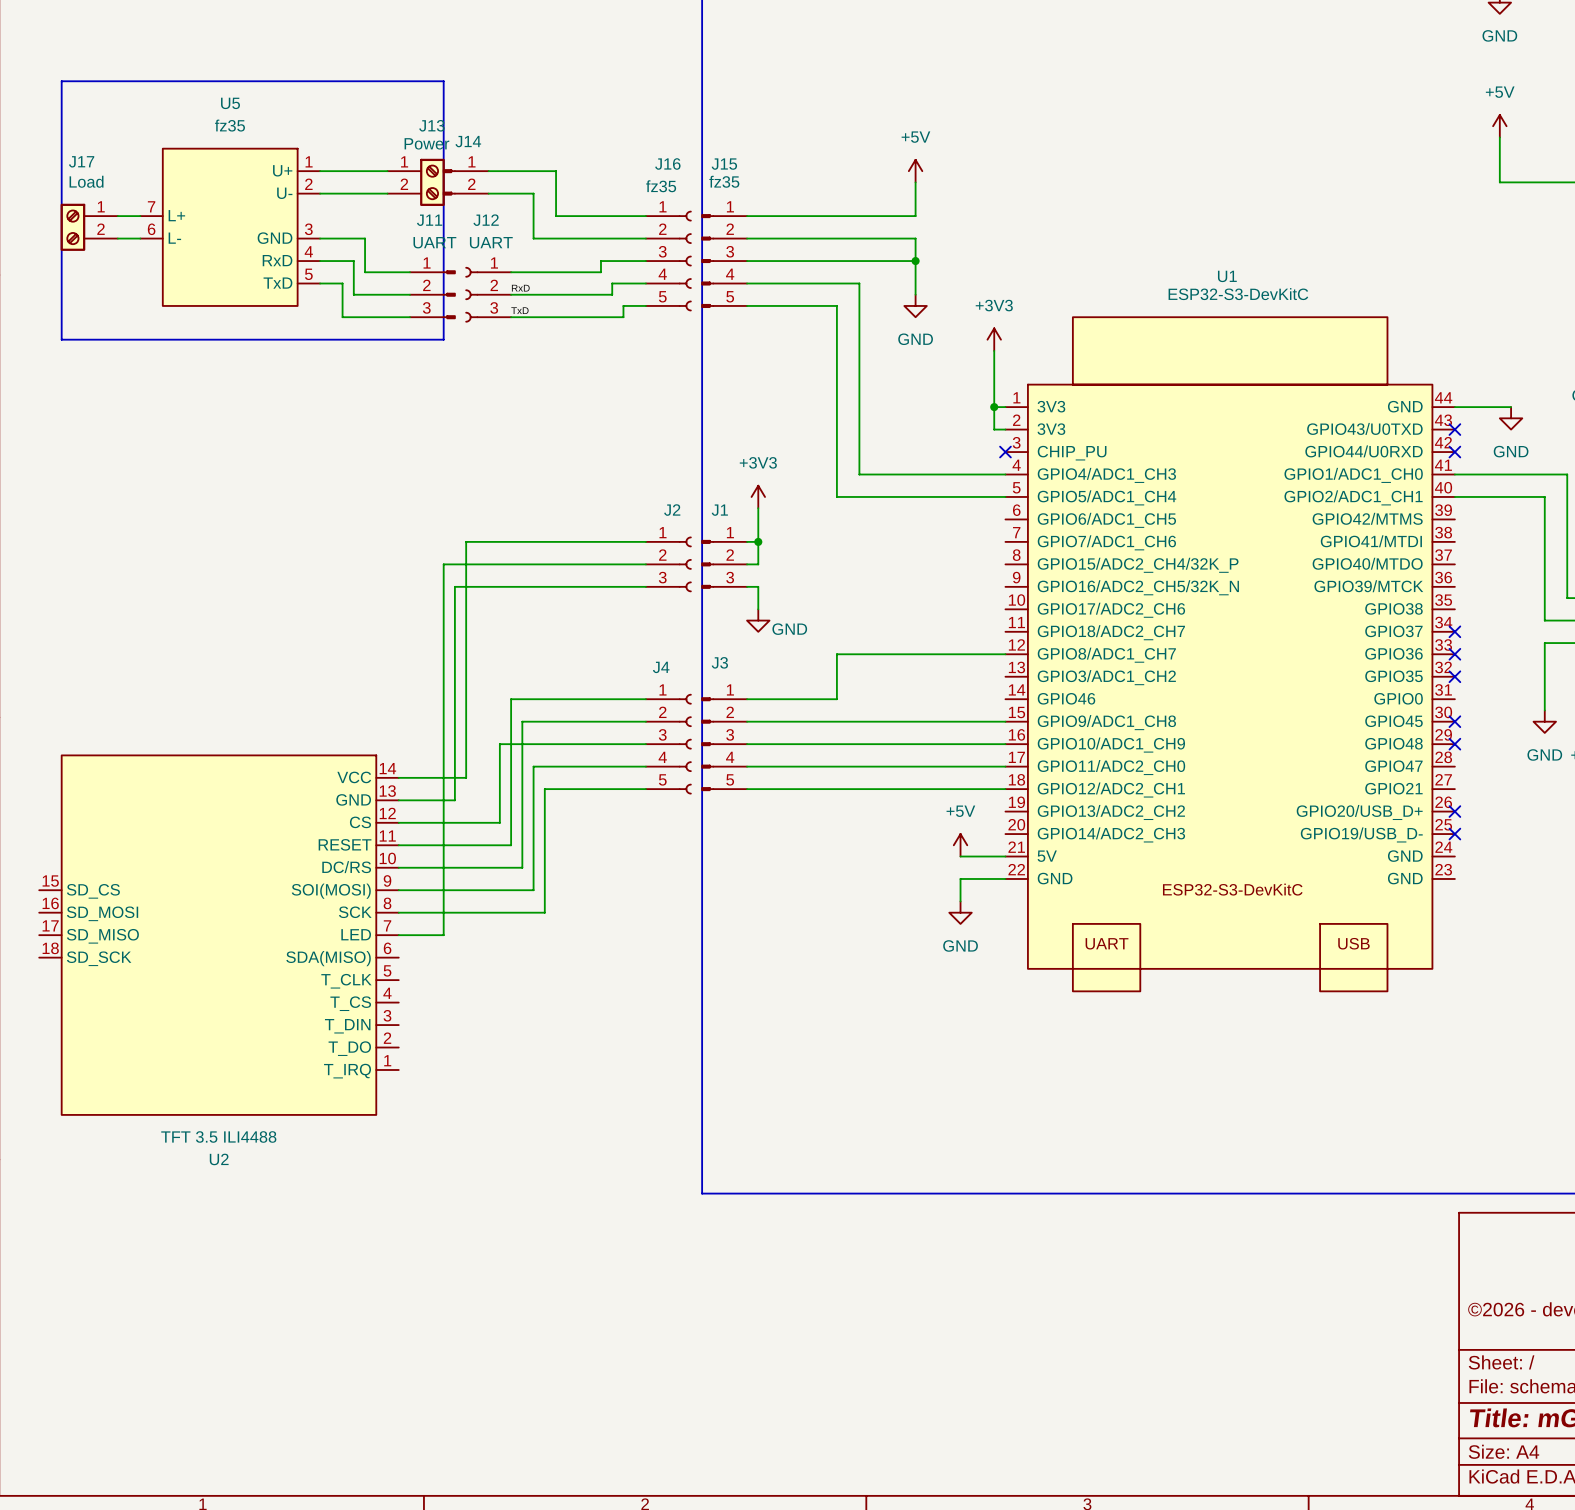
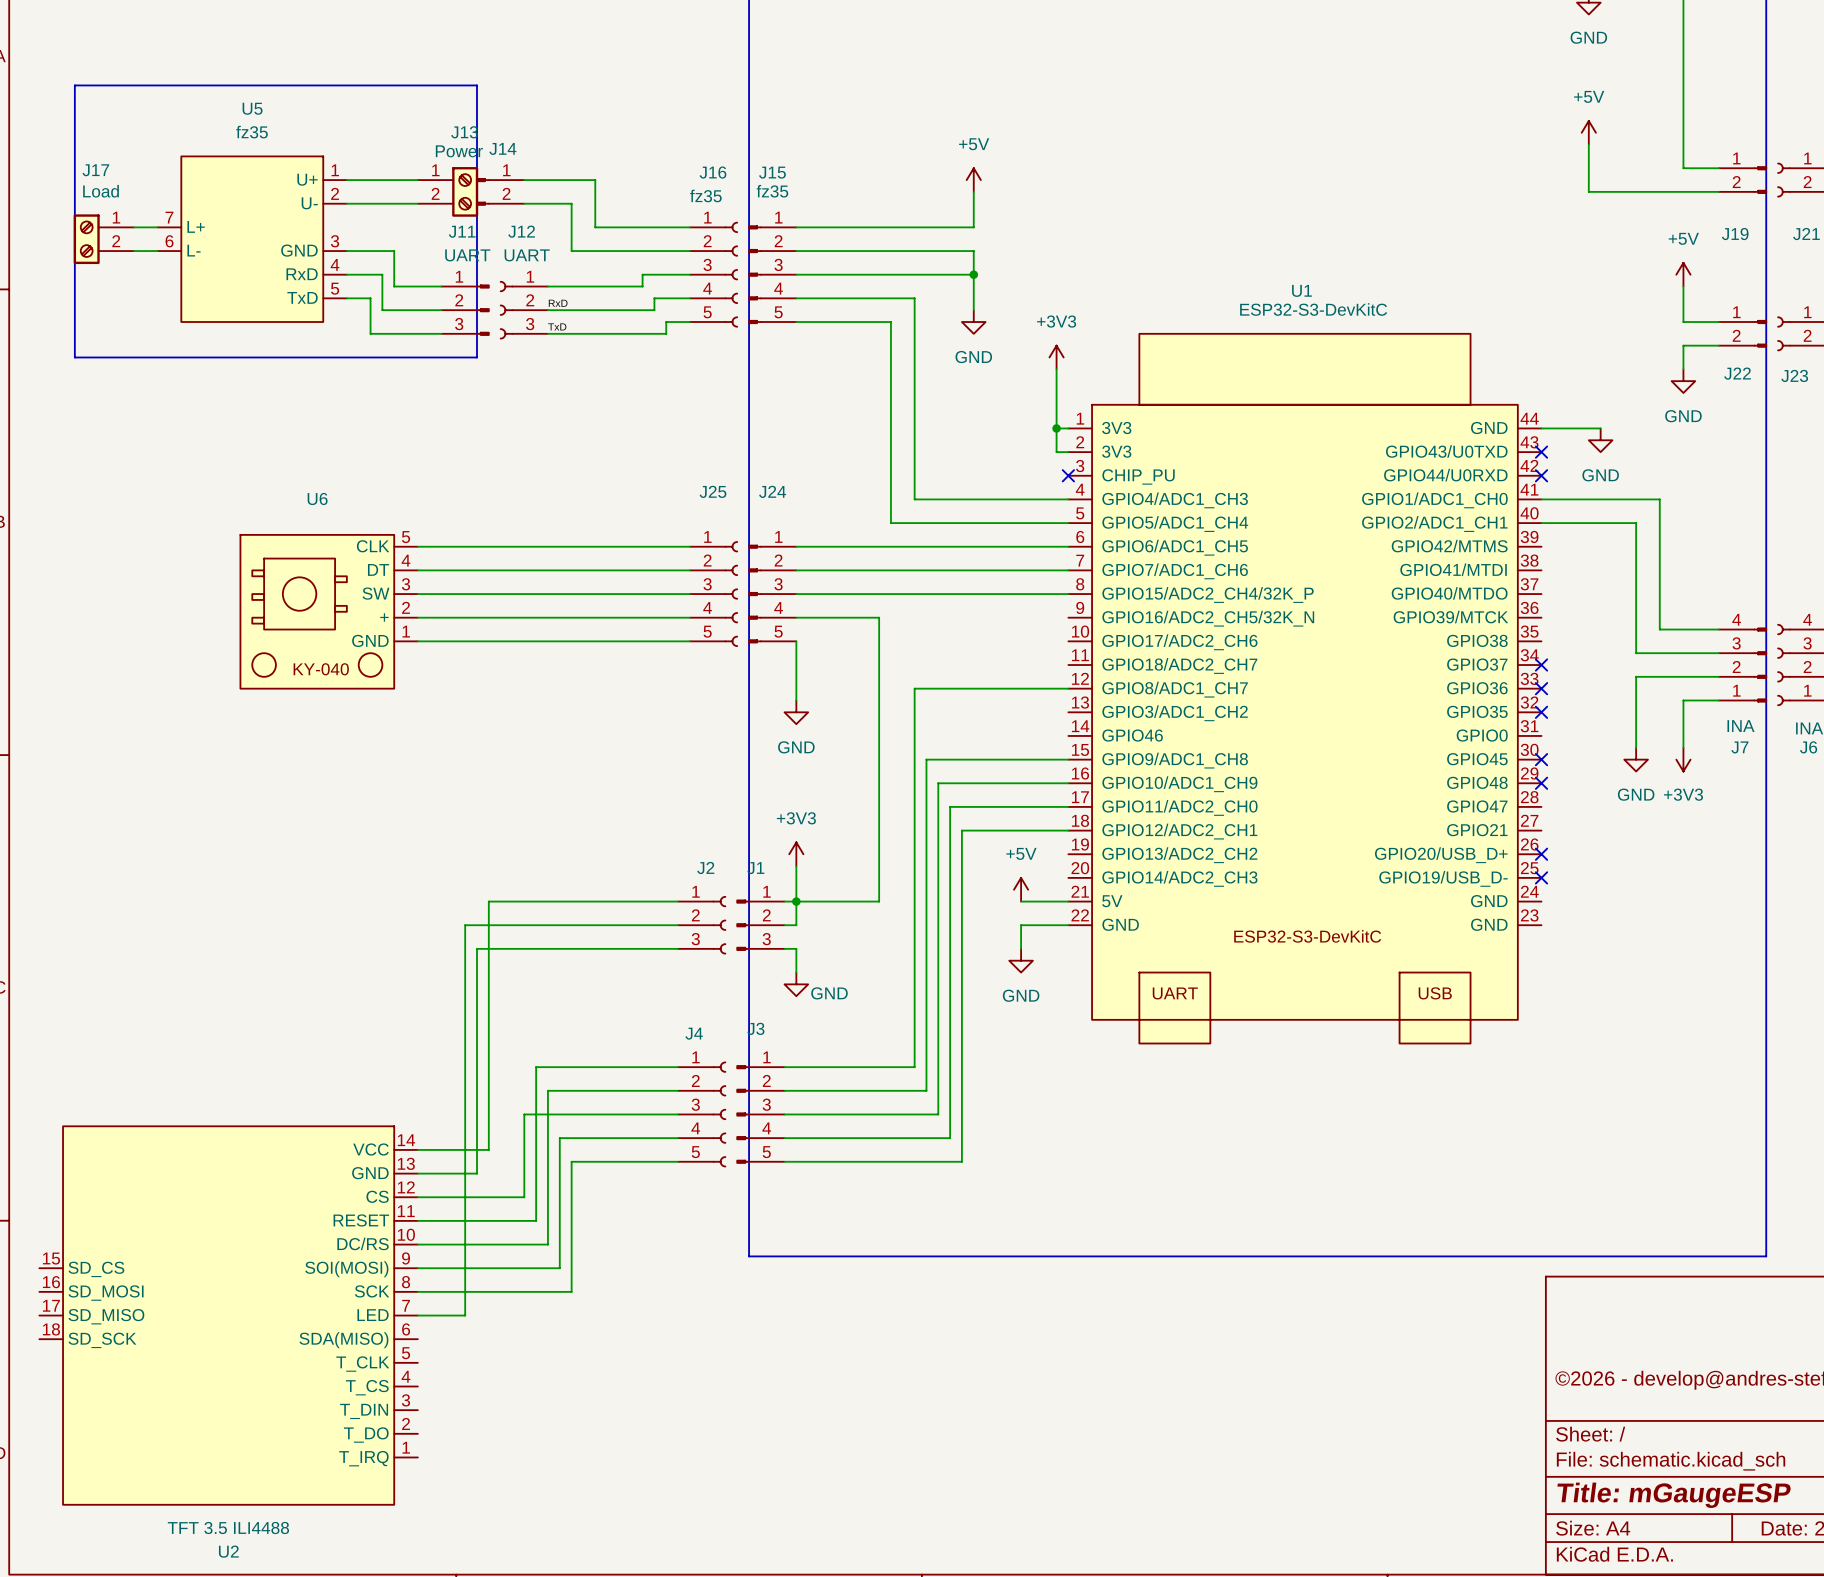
power symbol: +3V3 (758, 496) -> none
wire: (758, 508) (758, 564) -> (1068, 594) (808, 594)
wire: none -> (417, 546) (689, 546)
wire: none -> (796, 546) (1068, 546)
wire: (466, 541) (466, 777) (398, 777) -> (500, 570) (417, 570)
wire: none -> (808, 570) (1068, 570)
junction: (758, 541) -> none
wire: (443, 564) (443, 901) -> (477, 594) (417, 594)
J2 position: (668, 564) -> (702, 925)
J25: none -> (713, 594)
J1 position: (724, 564) -> (760, 925)
J24: none -> (772, 594)
U6: none -> (329, 611)
wire: (454, 586) (454, 800) (398, 800) -> (488, 617) (417, 617)
wire: (758, 586) (758, 609) -> (808, 617) (879, 617) (879, 901) (784, 901)
wire: none -> (417, 641) (689, 641)
wire: none -> (796, 641) (796, 700)
power symbol position: GND (758, 620) -> GND (796, 712)
power symbol text position: GND (789, 629) -> GND (796, 747)
wire: (859, 654) (836, 654) (836, 699) (747, 699) -> (914, 688) (914, 1067) (784, 1067)
wire: (645, 699) (511, 699) (511, 845) (398, 845) -> none
wire: (645, 721) (522, 721) (522, 867) (398, 867) -> none
wire: (747, 721) (870, 721) -> (784, 1090) (926, 1090) (926, 759)
wire: (645, 744) (499, 744) (499, 822) (398, 822) -> none
J4 position: (668, 744) -> (702, 1114)
J3 position: (724, 744) -> (760, 1114)
wire: (747, 744) (881, 744) -> (784, 1114) (938, 1114) (938, 783)
wire: (645, 766) (533, 766) (533, 890) (398, 890) -> none
wire: (747, 766) (893, 766) -> (784, 1138) (950, 1138) (950, 806)
wire: (645, 789) (544, 789) (544, 912) (398, 912) -> none
wire: (747, 789) (904, 789) -> (784, 1161) (961, 1161) (961, 830)
power symbol: none -> +3V3 (796, 854)
wire: none -> (796, 866) (796, 925) (784, 925)
wire: none -> (678, 901) (488, 901) (488, 1149) (417, 1149)
junction: none -> (796, 901)
wire: none -> (678, 925) (465, 925) (465, 1315) (417, 1315)
wire: none -> (477, 948) (678, 948)
wire: none -> (784, 948) (796, 948) (796, 972)
U2 position: (218, 935) -> (228, 1315)
wire: (398, 935) (443, 935) -> (417, 1173) (477, 1173) (477, 984)
power symbol: none -> GND (796, 984)
wire: none -> (678, 1067) (536, 1067) (536, 1220) (417, 1220)
wire: none -> (678, 1090) (547, 1090) (547, 1244) (417, 1244)
wire: none -> (678, 1114) (524, 1114) (524, 1197) (417, 1197)
wire: none -> (678, 1138) (559, 1138) (559, 1268) (417, 1268)
wire: none -> (678, 1161) (571, 1161) (571, 1291) (417, 1291)

